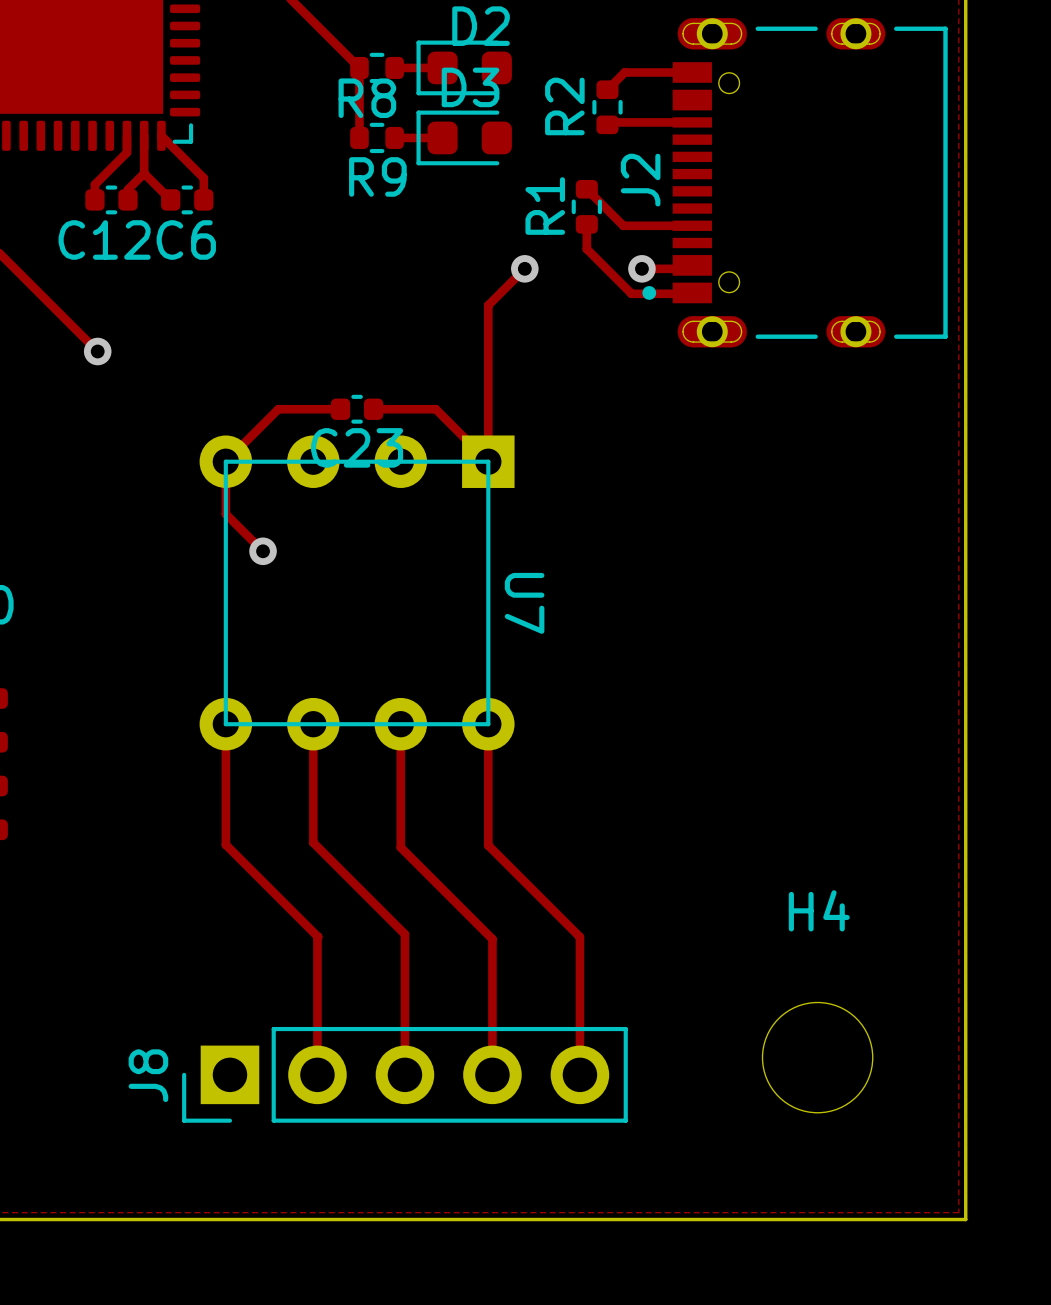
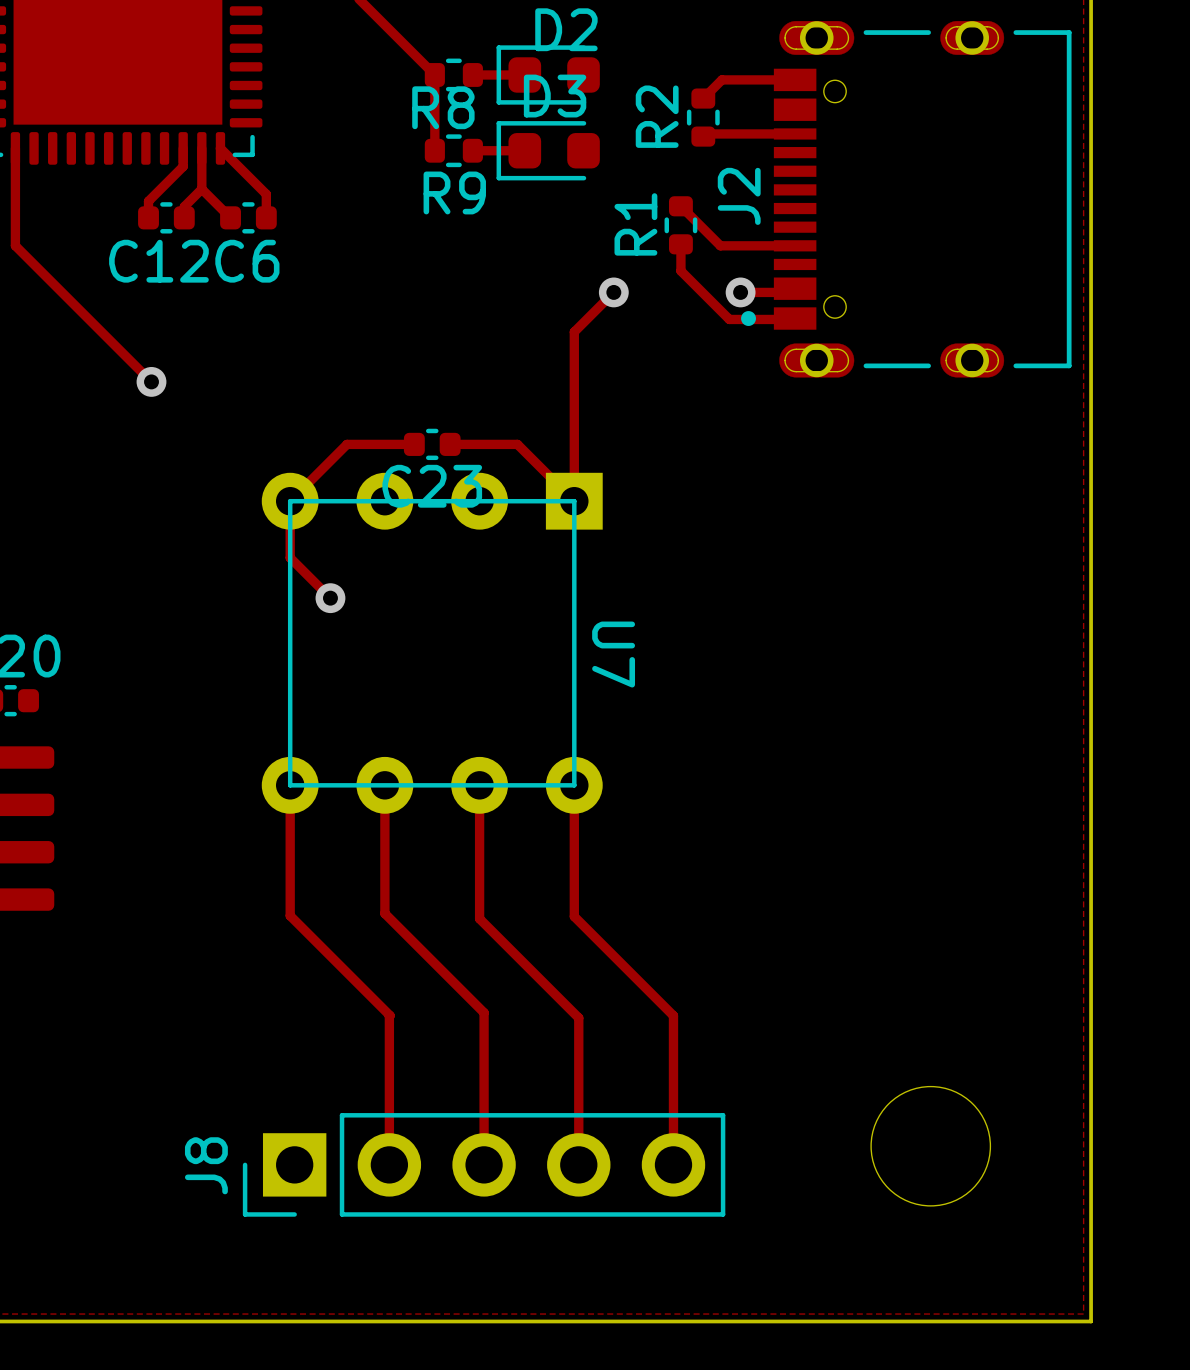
H4 name: H4 (819, 910) -> none

